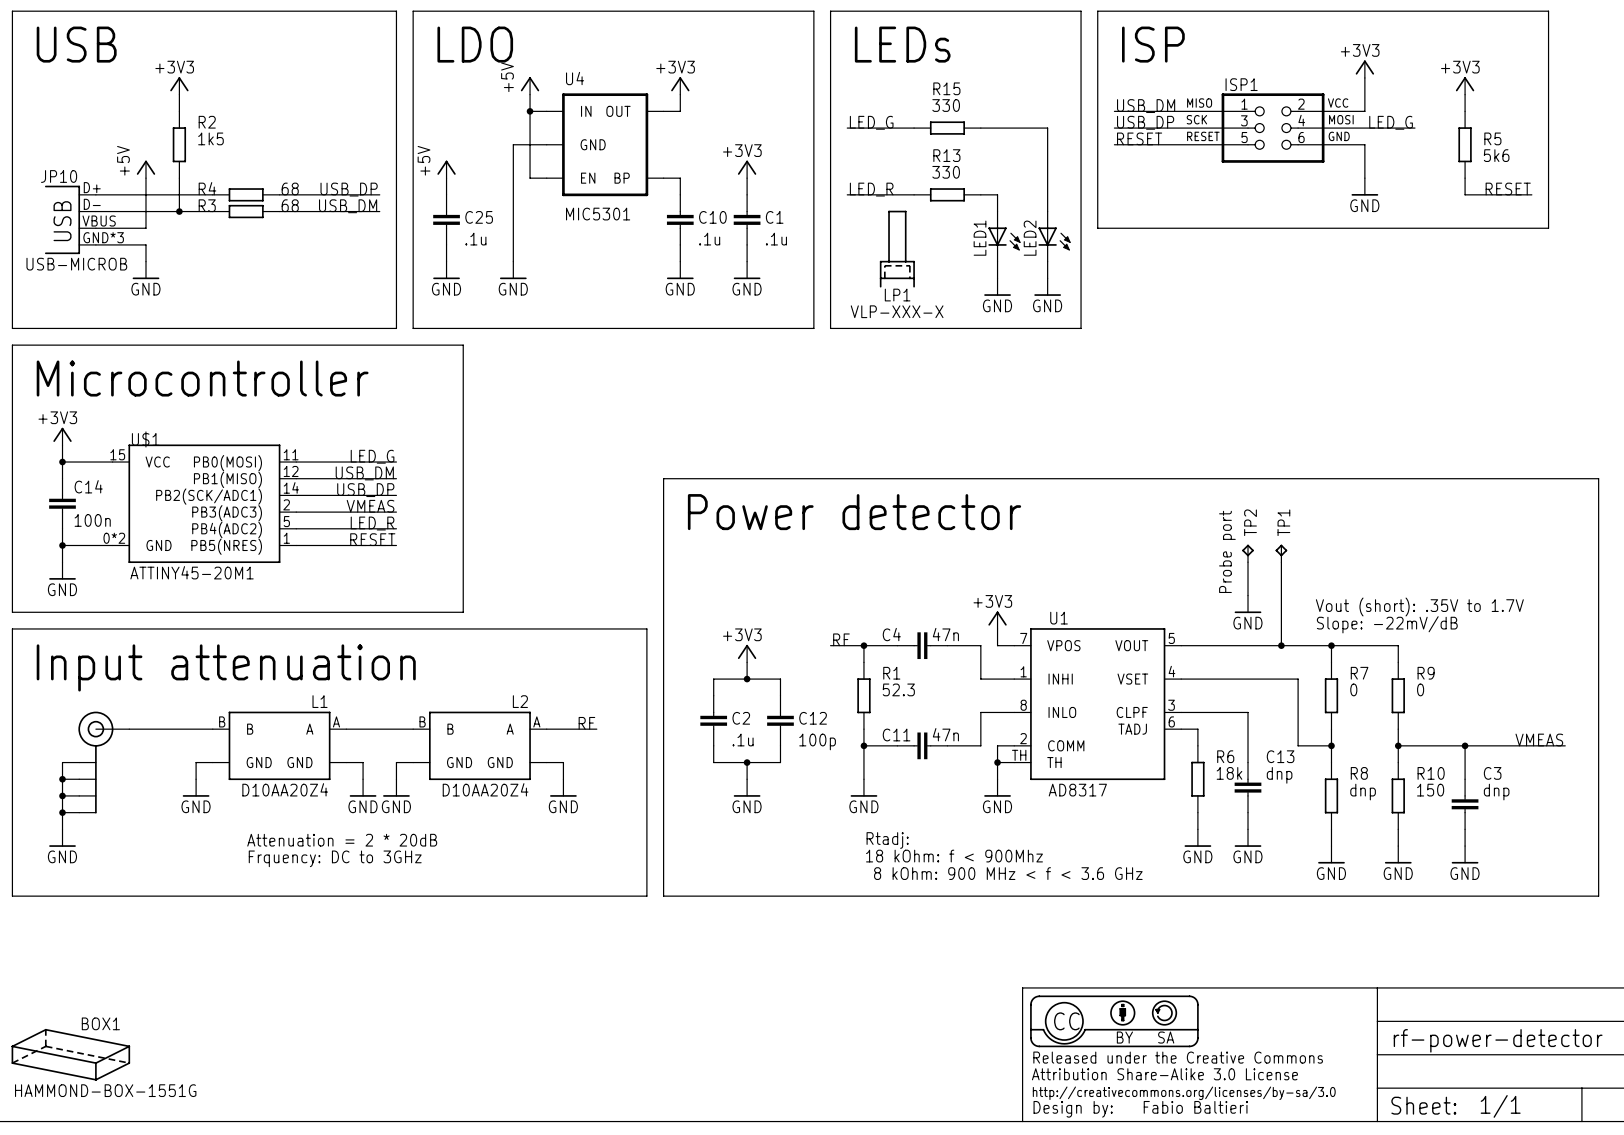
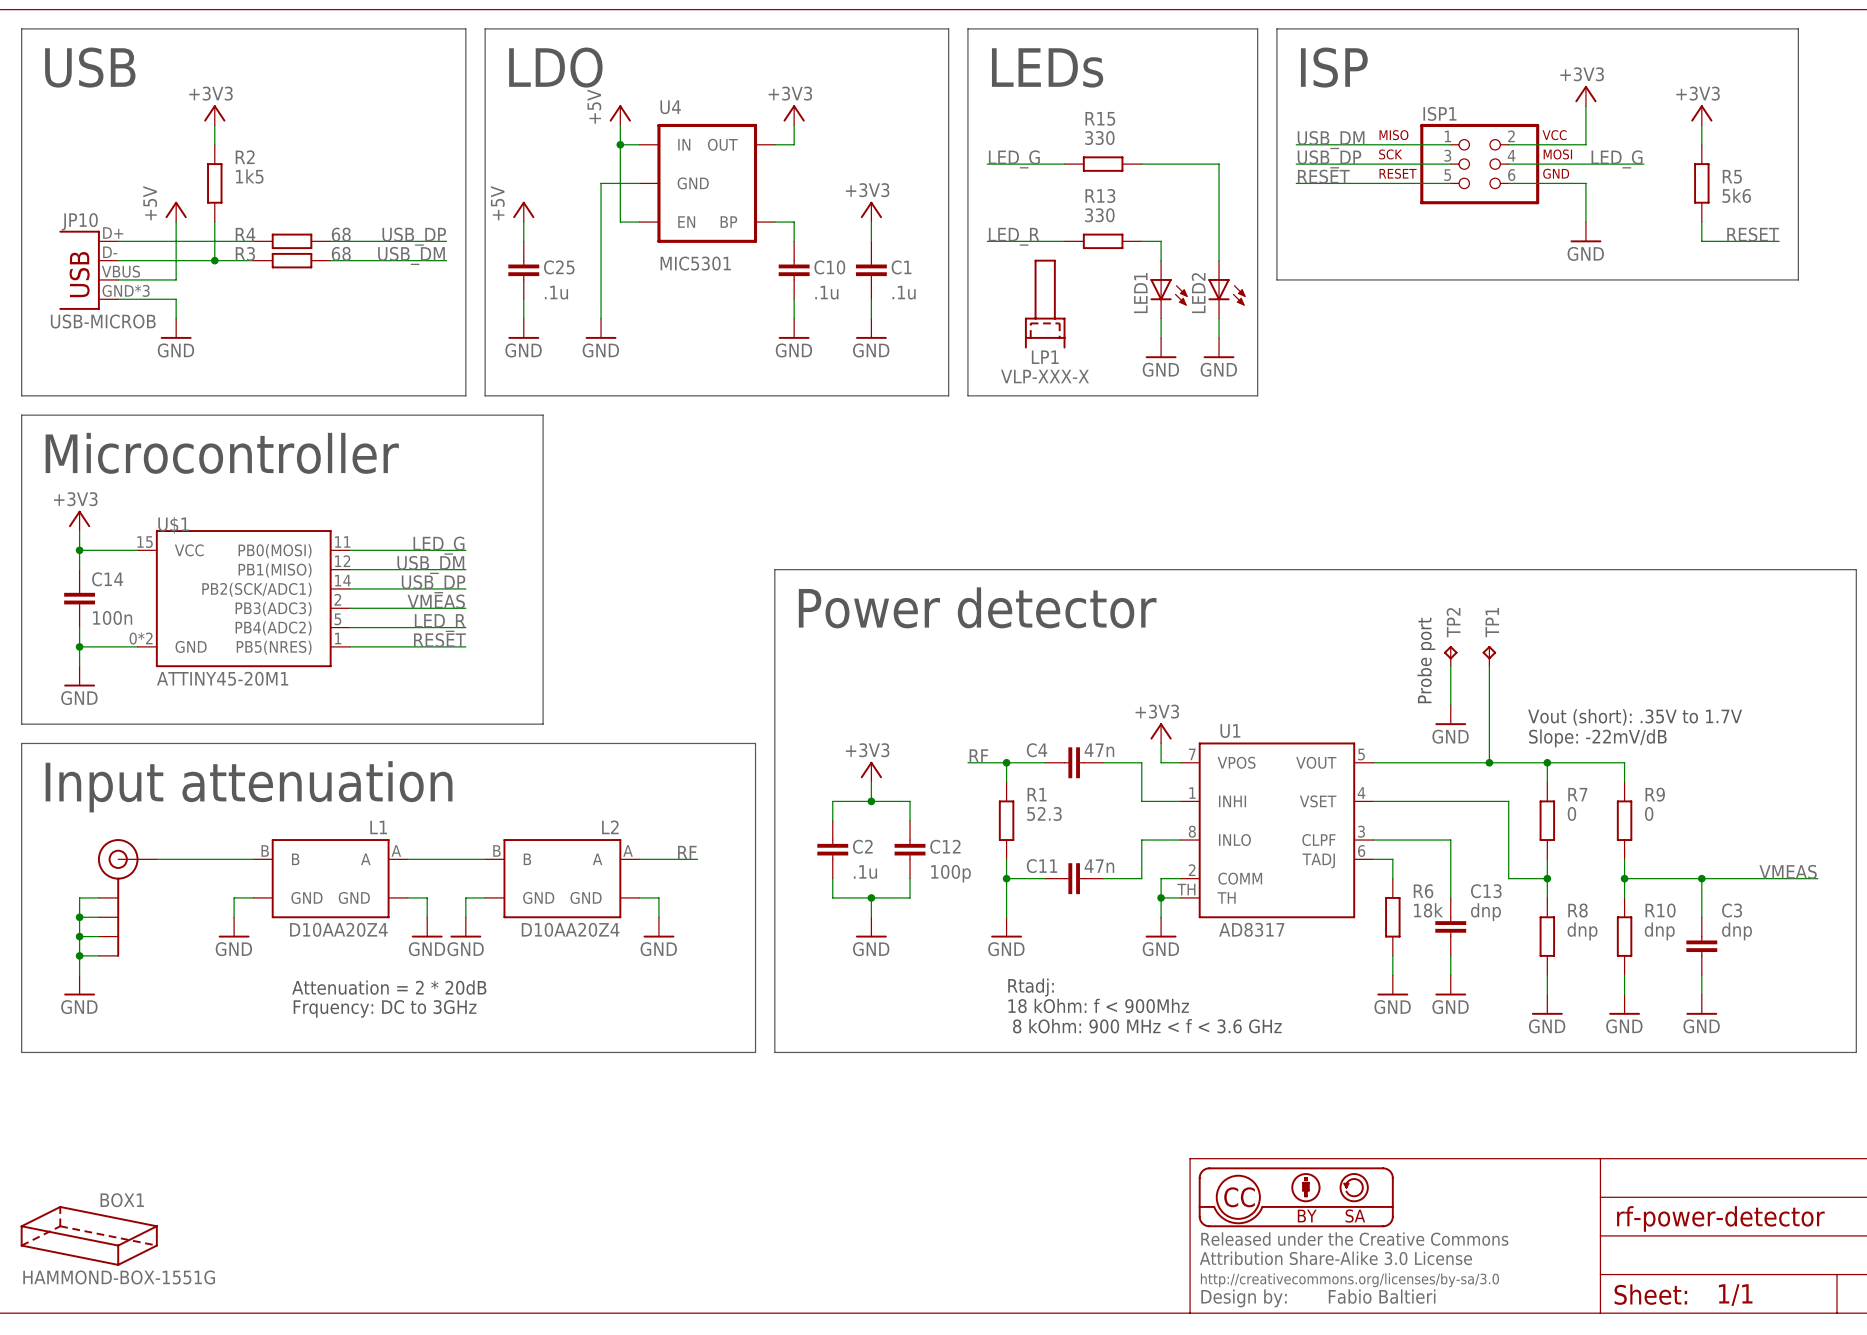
R10 value: 150 (1430, 790) -> dnp (1659, 931)

